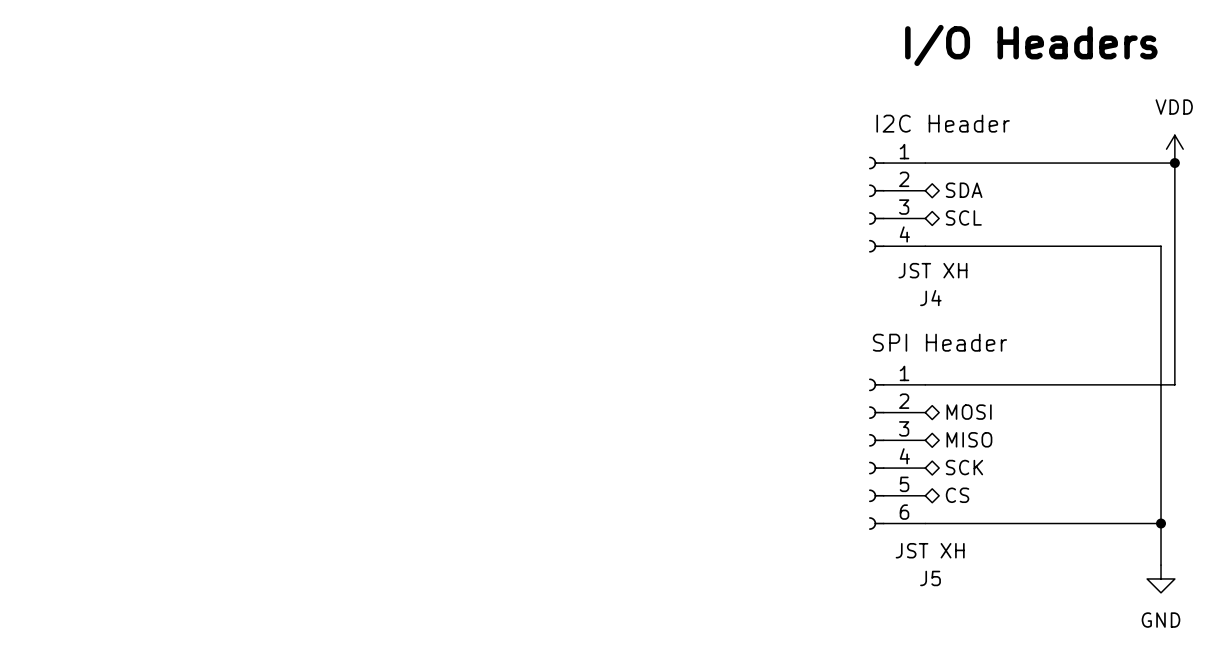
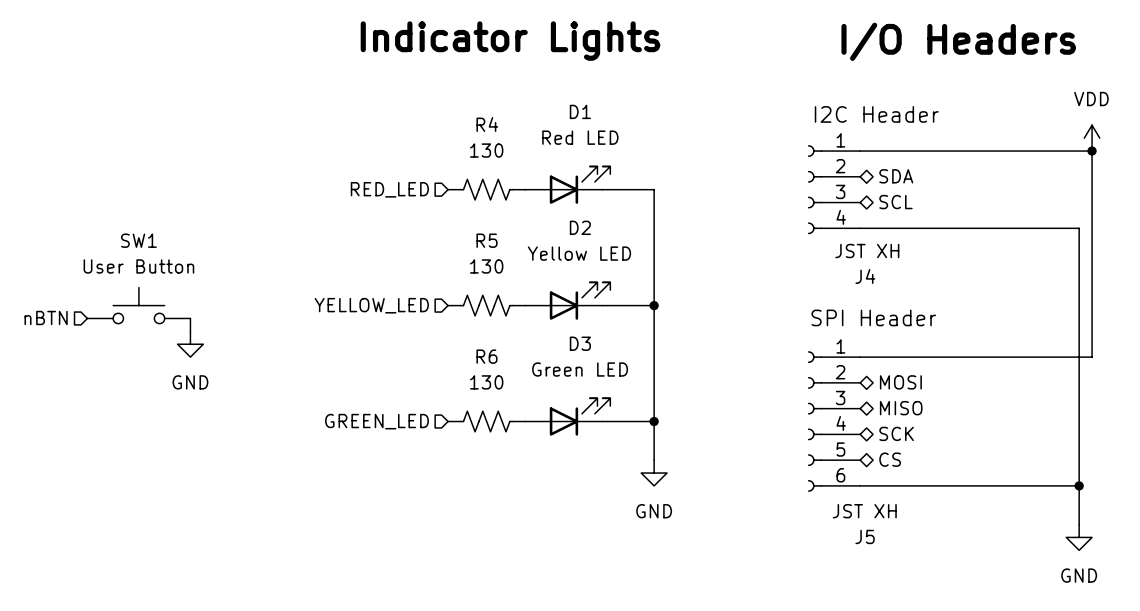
text: none -> Indicator Lights (510, 41)
D1: none -> Red LED (567, 185)
hierarchical label: none -> RED_LED (389, 189)
R4: none -> 130 (486, 189)
wire: none -> (602, 189) (654, 189) (654, 460)
D2: none -> Yellow LED (567, 301)
SW1: none -> User Button (138, 305)
hierarchical label: none -> YELLOW_LED (371, 305)
R5: none -> 130 (486, 305)
wire: none -> (602, 305) (654, 305)
junction: none -> (654, 305)
hierarchical label: none -> nBTN (46, 317)
wire: none -> (190, 318) (190, 331)
power symbol: none -> GND (190, 344)
D3: none -> Green LED (567, 417)
hierarchical label: none -> GREEN_LED (377, 421)
R6: none -> 130 (486, 421)
wire: none -> (602, 421) (654, 421)
junction: none -> (654, 421)
power symbol: none -> GND (654, 473)

